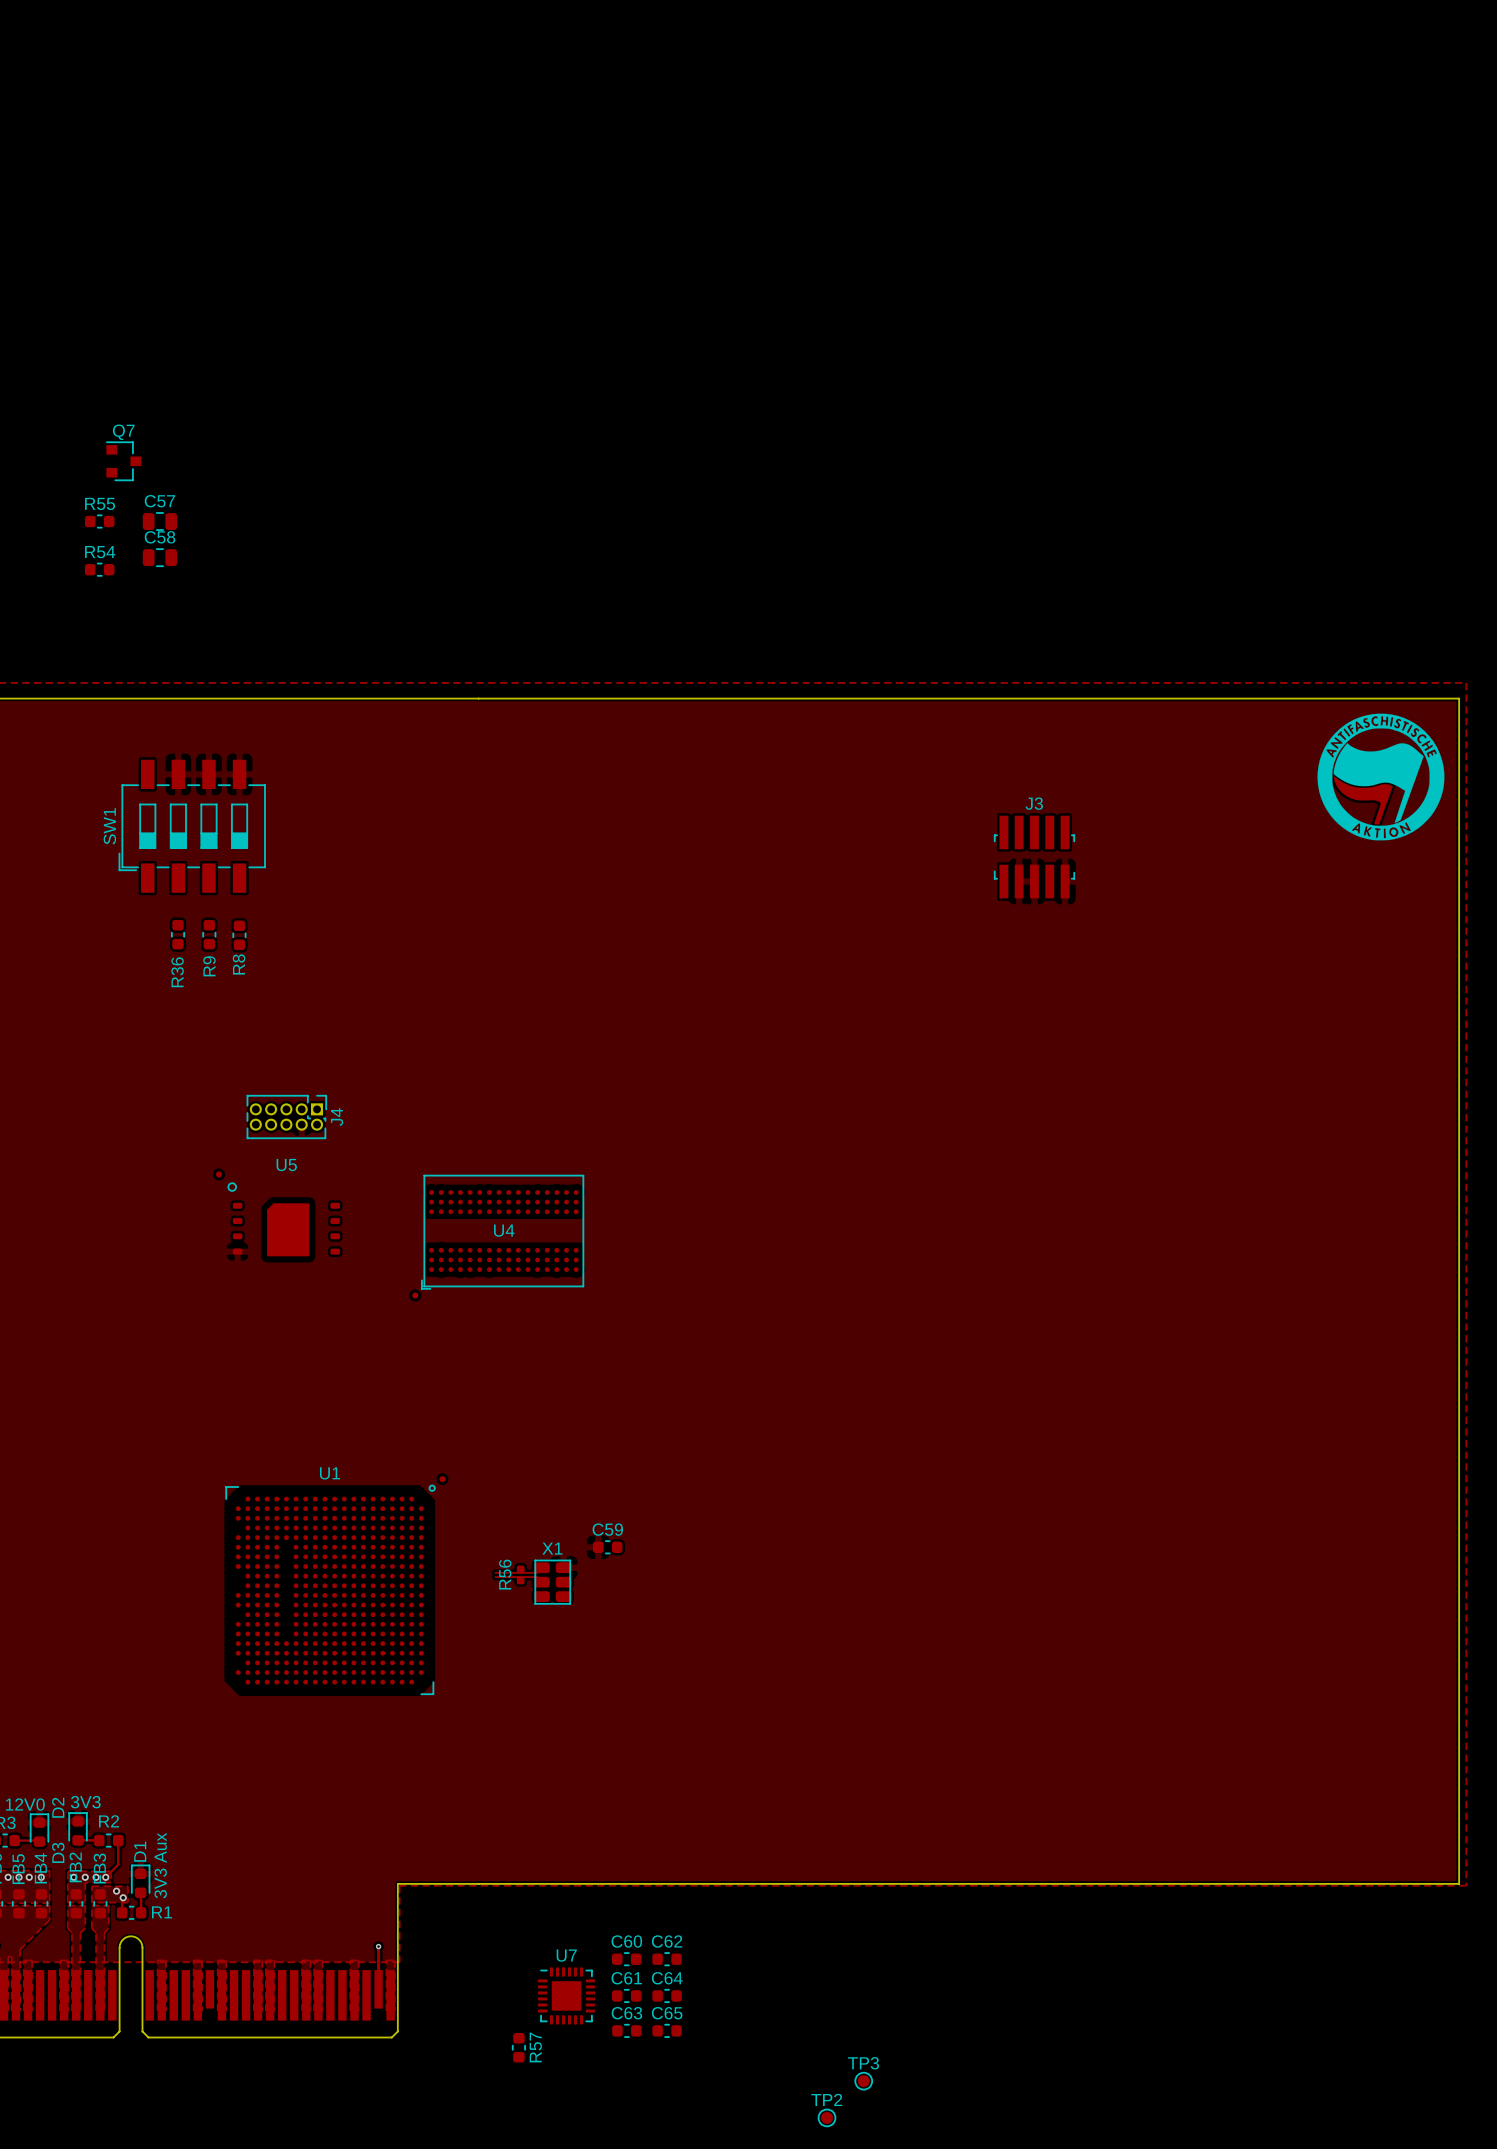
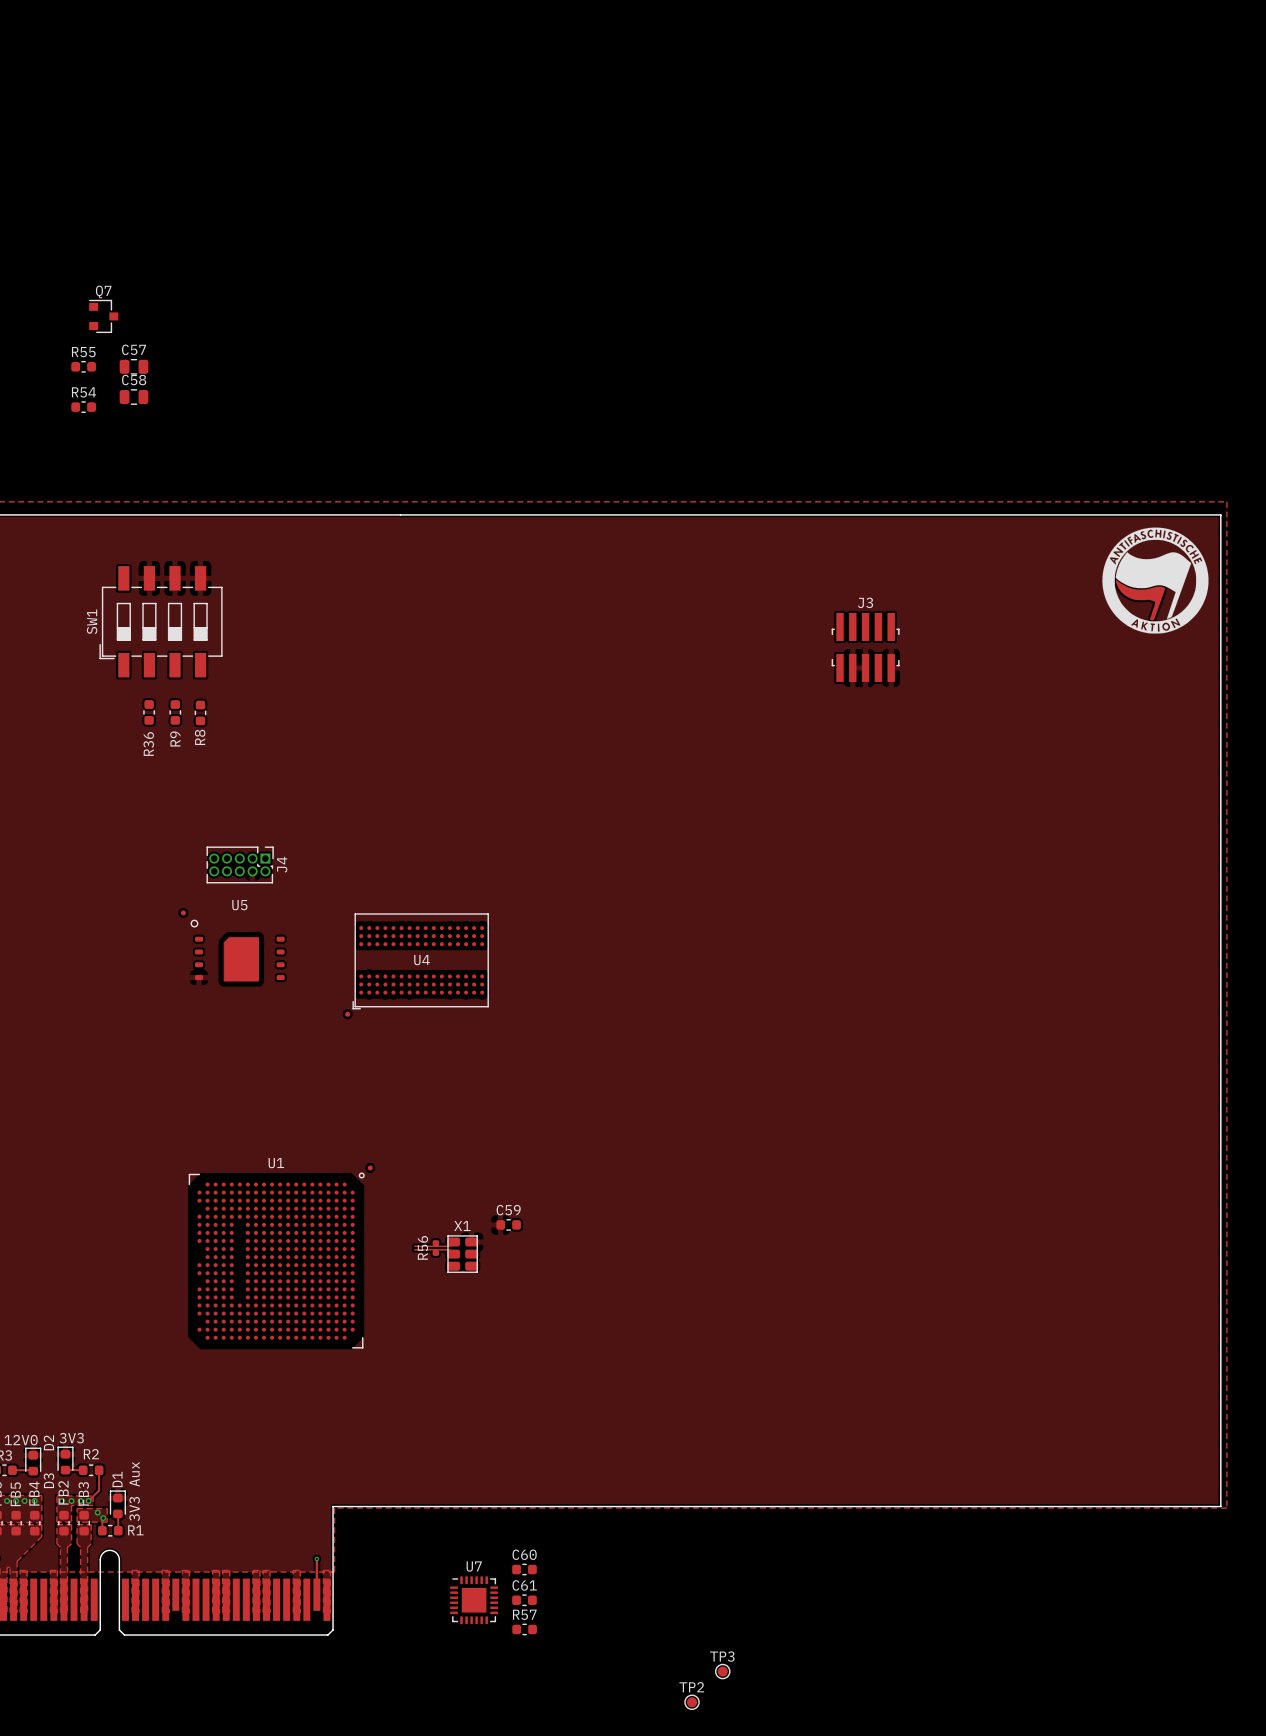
C62: (667, 1959) -> none
C64: (667, 1995) -> none
C63 name: C63 (626, 2013) -> R57 (524, 1614)
C65: (667, 2030) -> none
R57: (518, 2047) -> none

